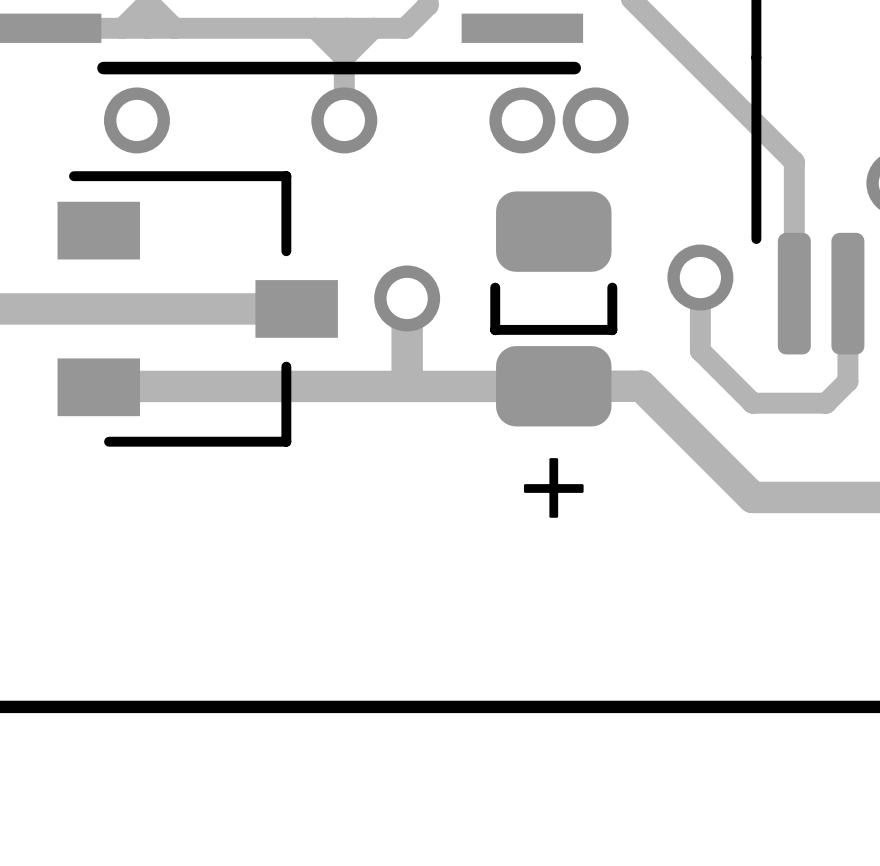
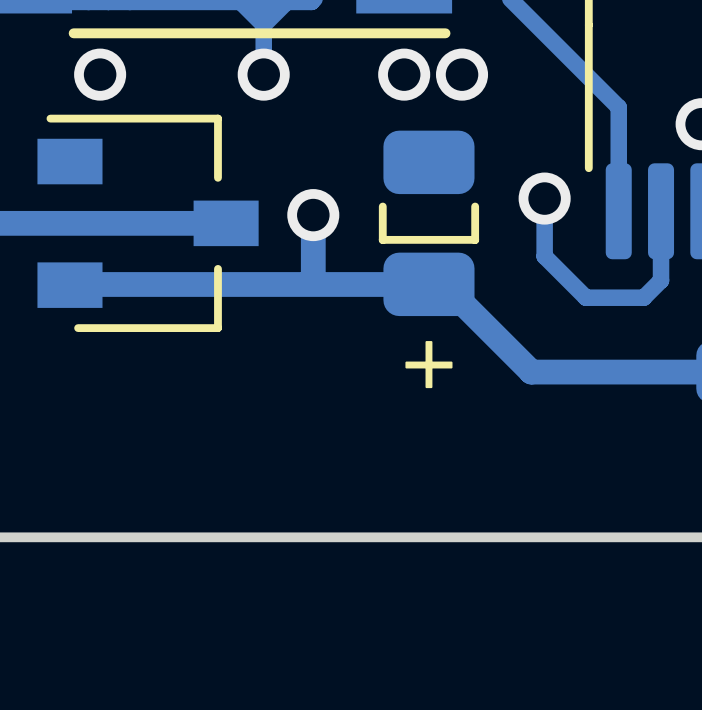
track: (572, 386) (641, 386) (752, 497) -> (443, 284) (531, 372) (585, 372)

